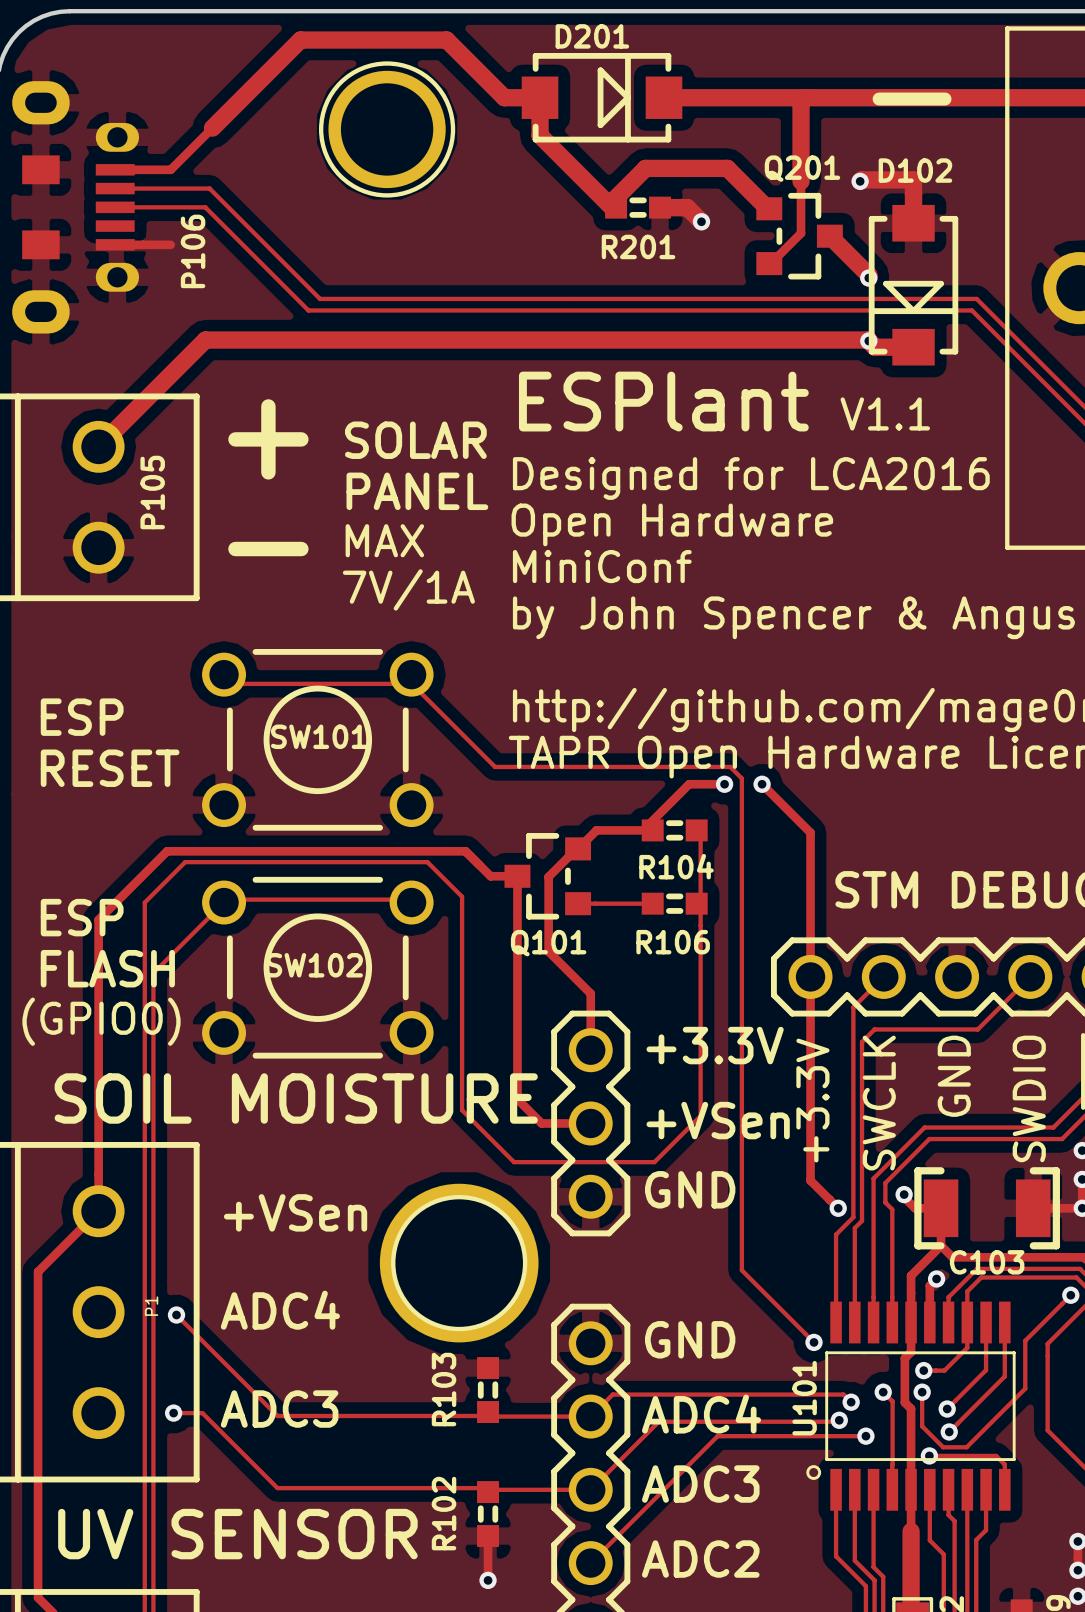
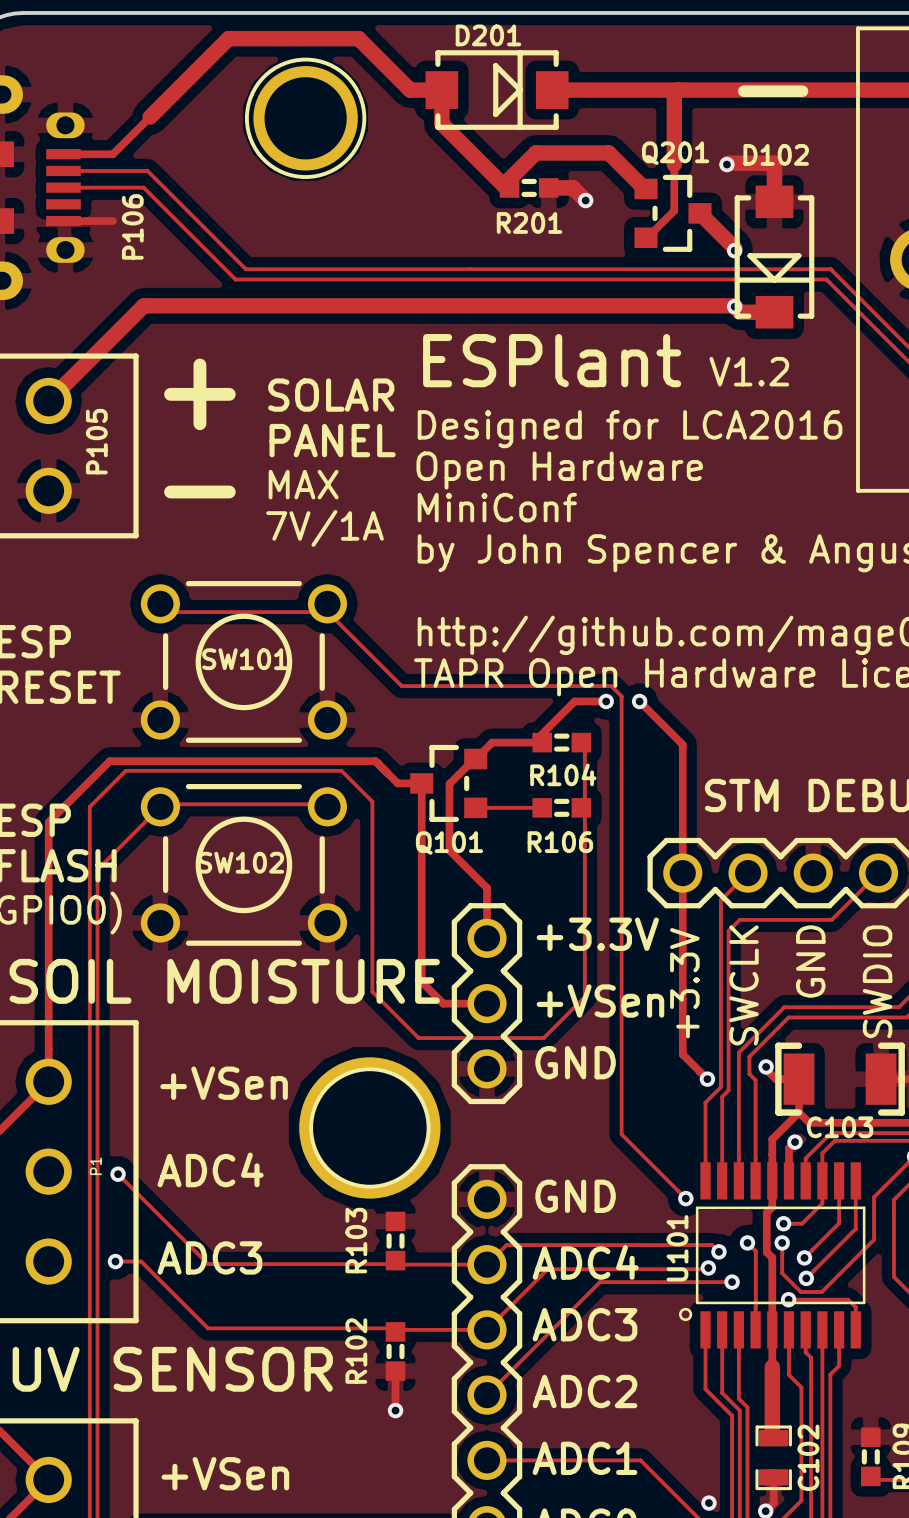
text: V1.1 (885, 413) -> V1.2 (749, 371)

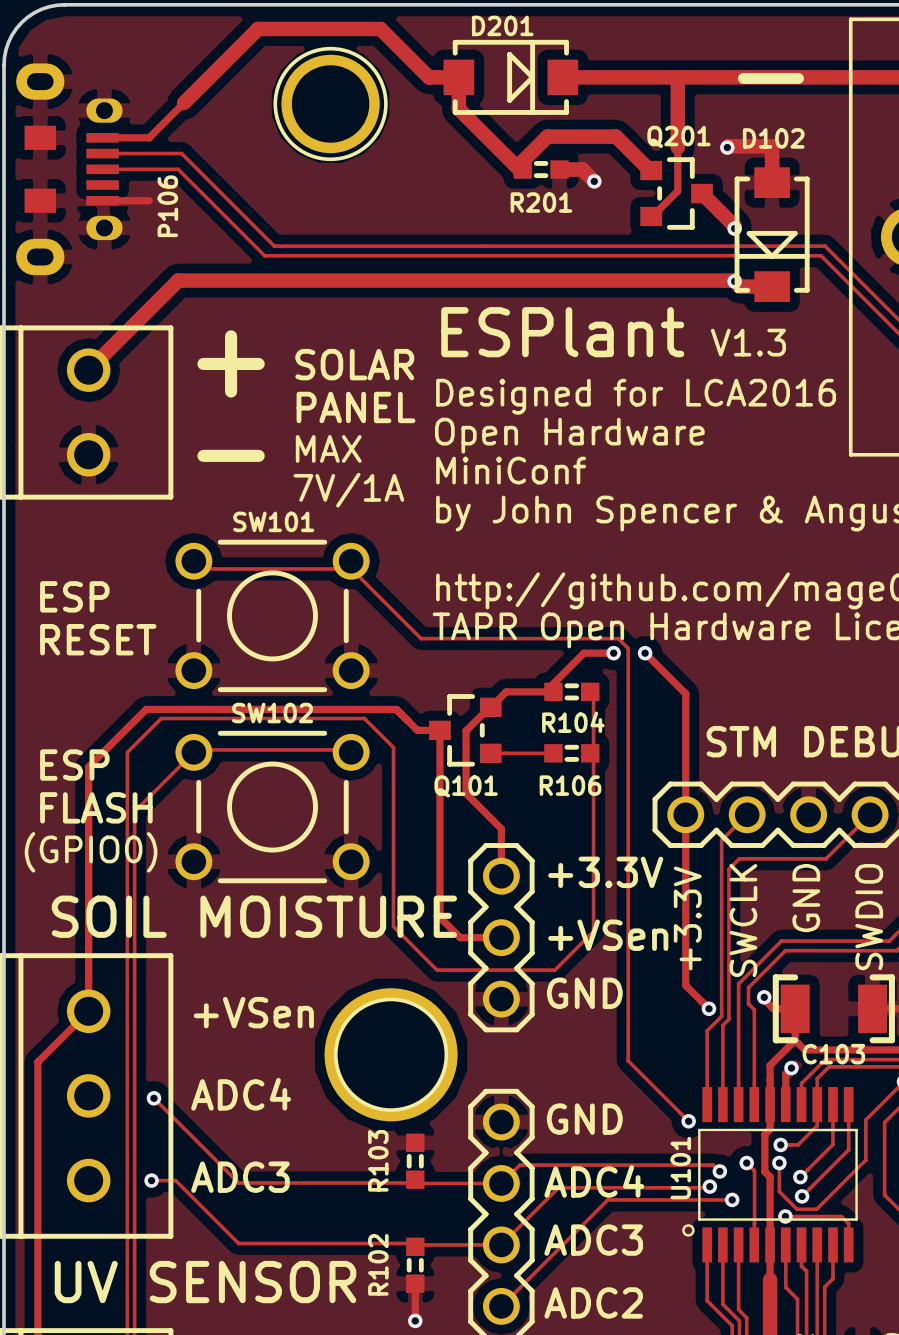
text: V1.2 (749, 371) -> V1.3 (748, 342)
P105 name: P105 (96, 441) -> none
SW101 name position: SW101 (245, 659) -> SW101 (273, 521)
SW102 name position: SW102 (241, 862) -> SW102 (272, 713)
P1 name: P1 (95, 1166) -> none

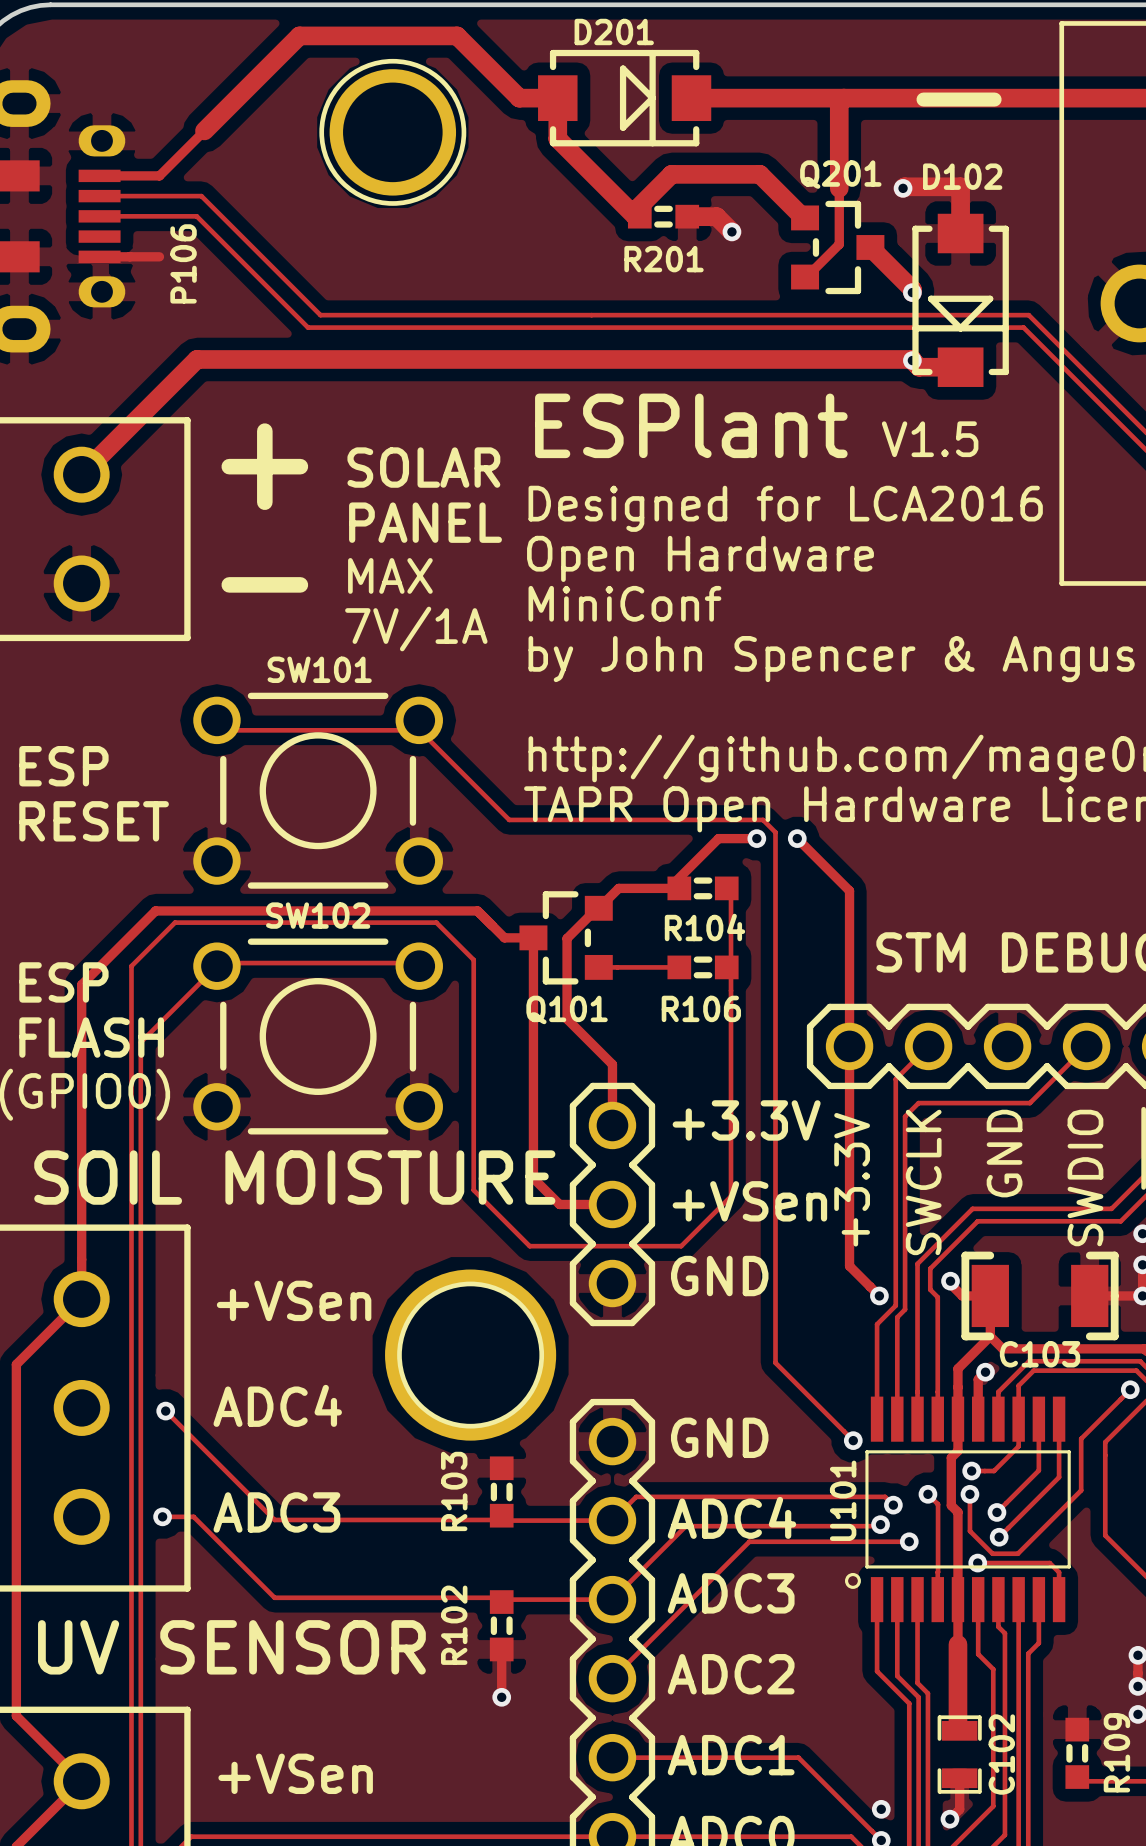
text: V1.3 (748, 342) -> V1.5 (930, 439)

